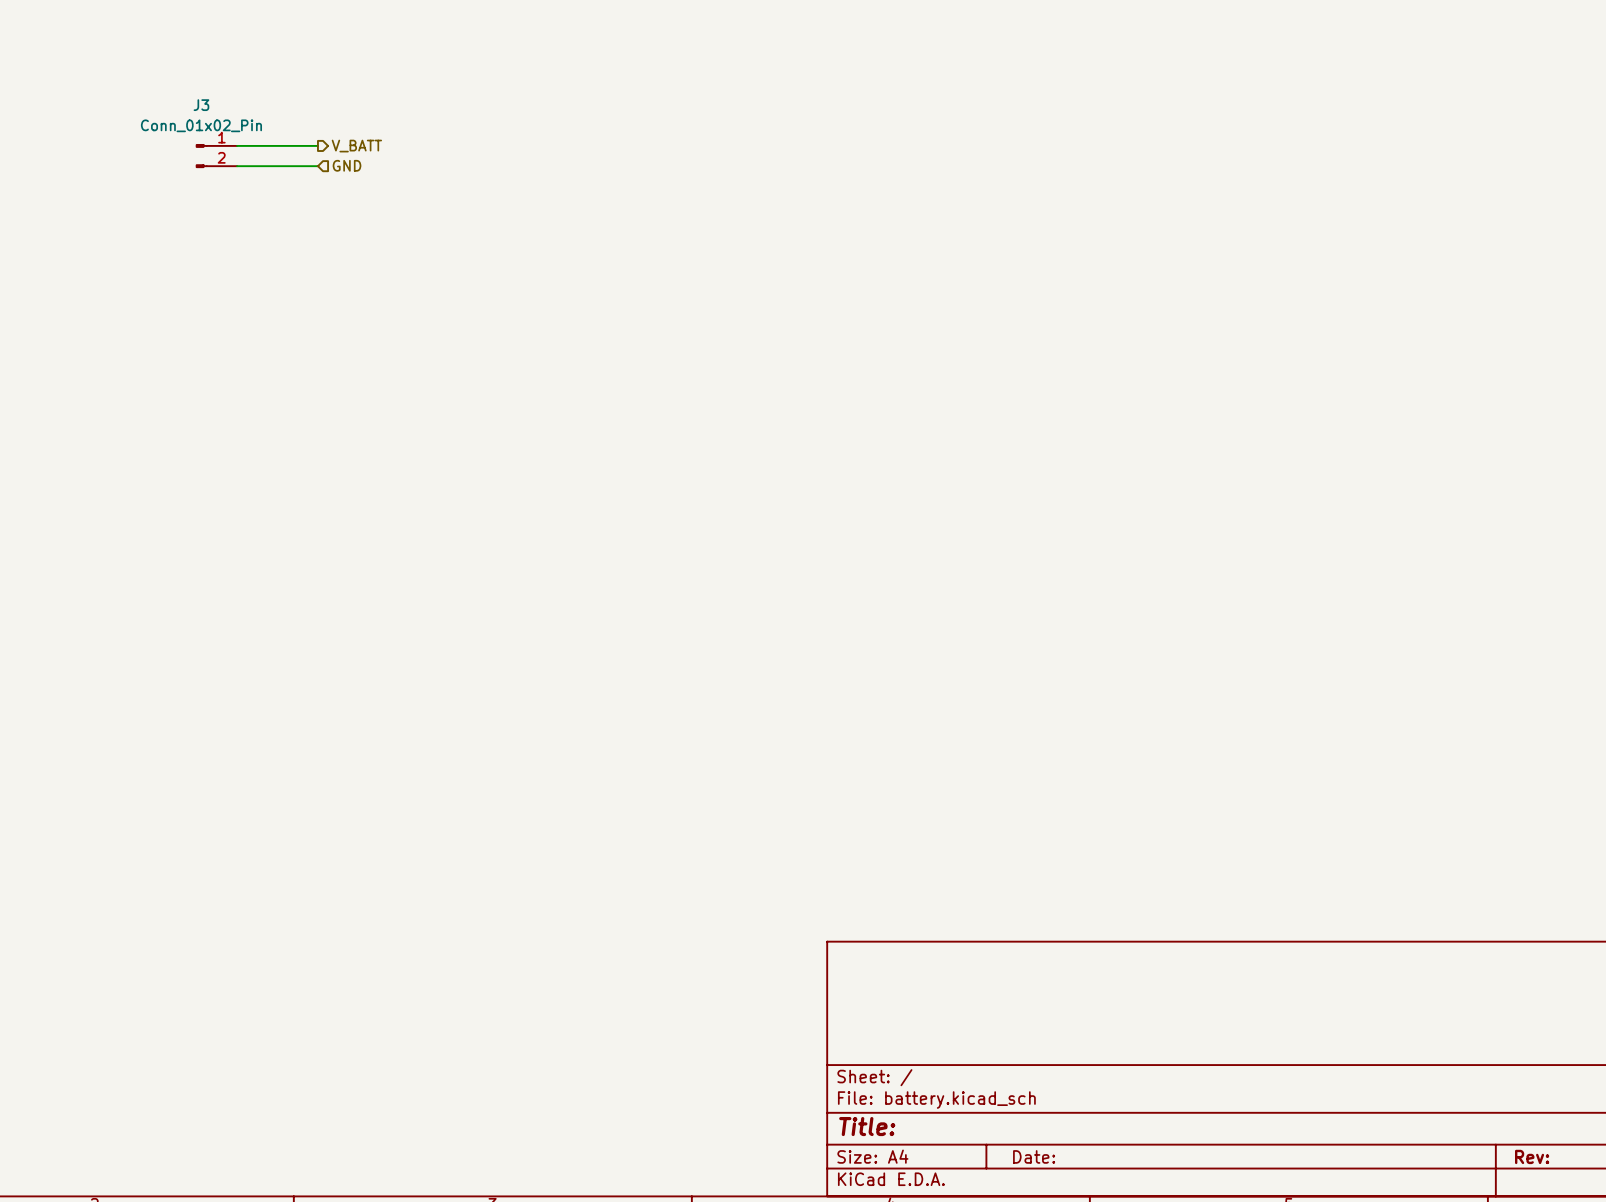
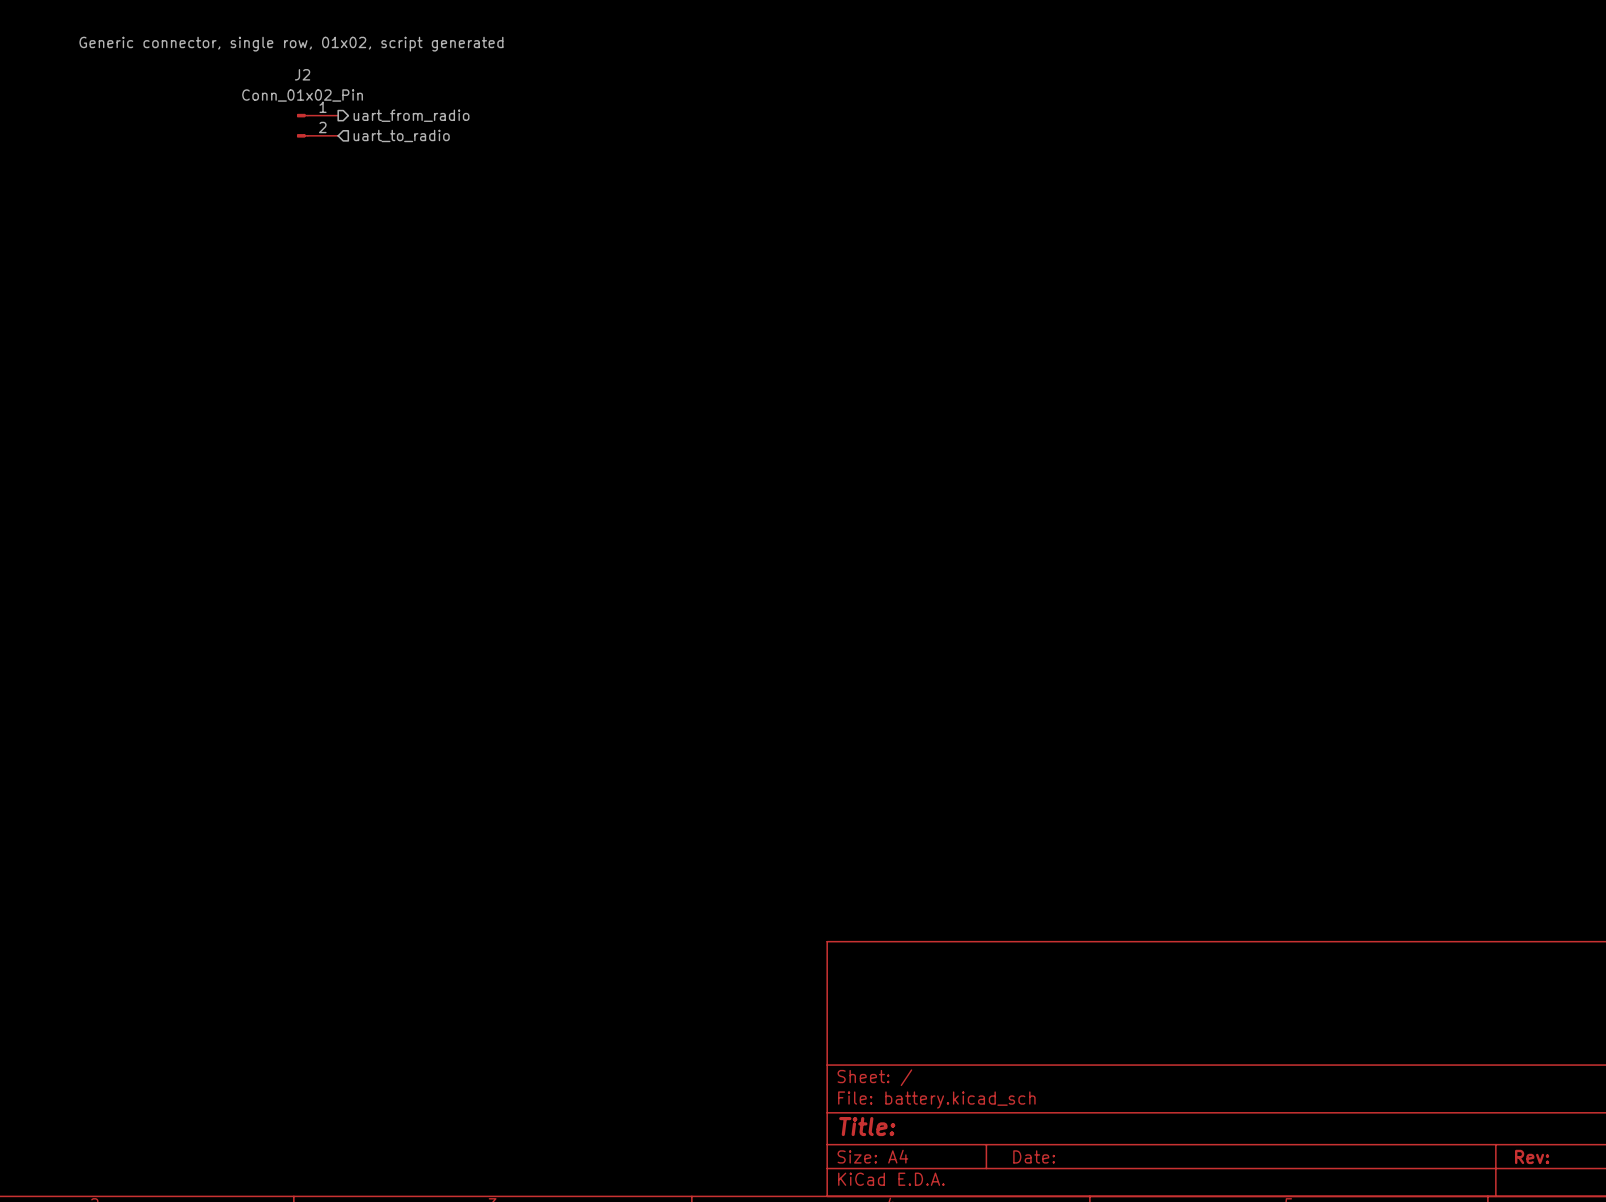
hierarchical label: none -> uart_from_radio (411, 115)
J2: none -> Conn_01x02_Pin (317, 125)
hierarchical label: none -> uart_to_radio (401, 135)
wire: (237, 145) (317, 145) -> none
hierarchical label: V_BATT (356, 146) -> none
J3: Conn_01x02_Pin (216, 156) -> none
hierarchical label: GND (347, 165) -> none
wire: (237, 166) (317, 166) -> none

